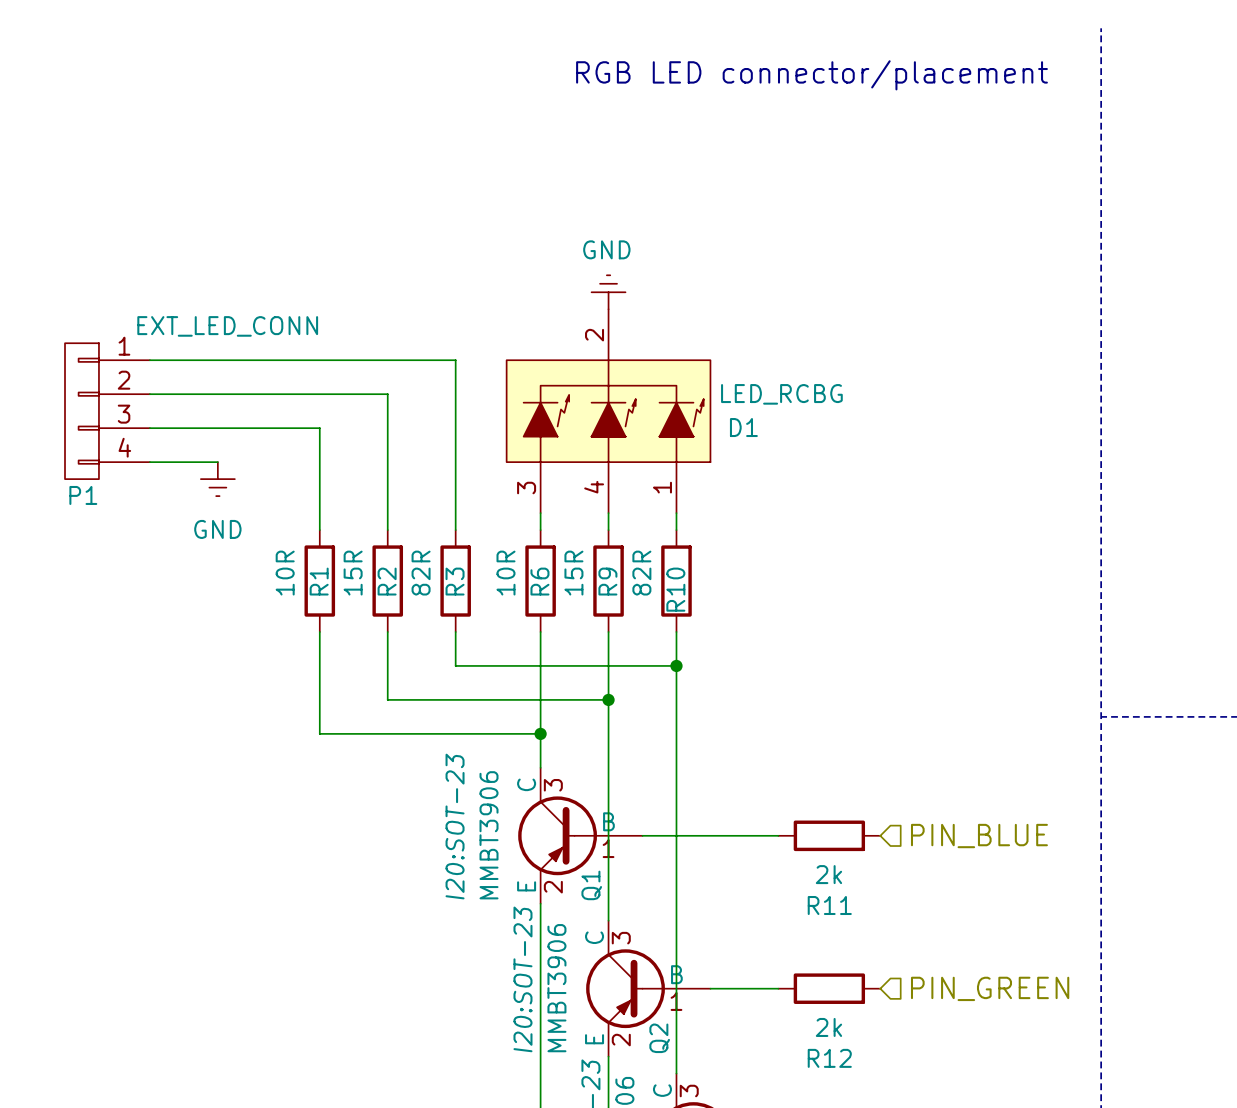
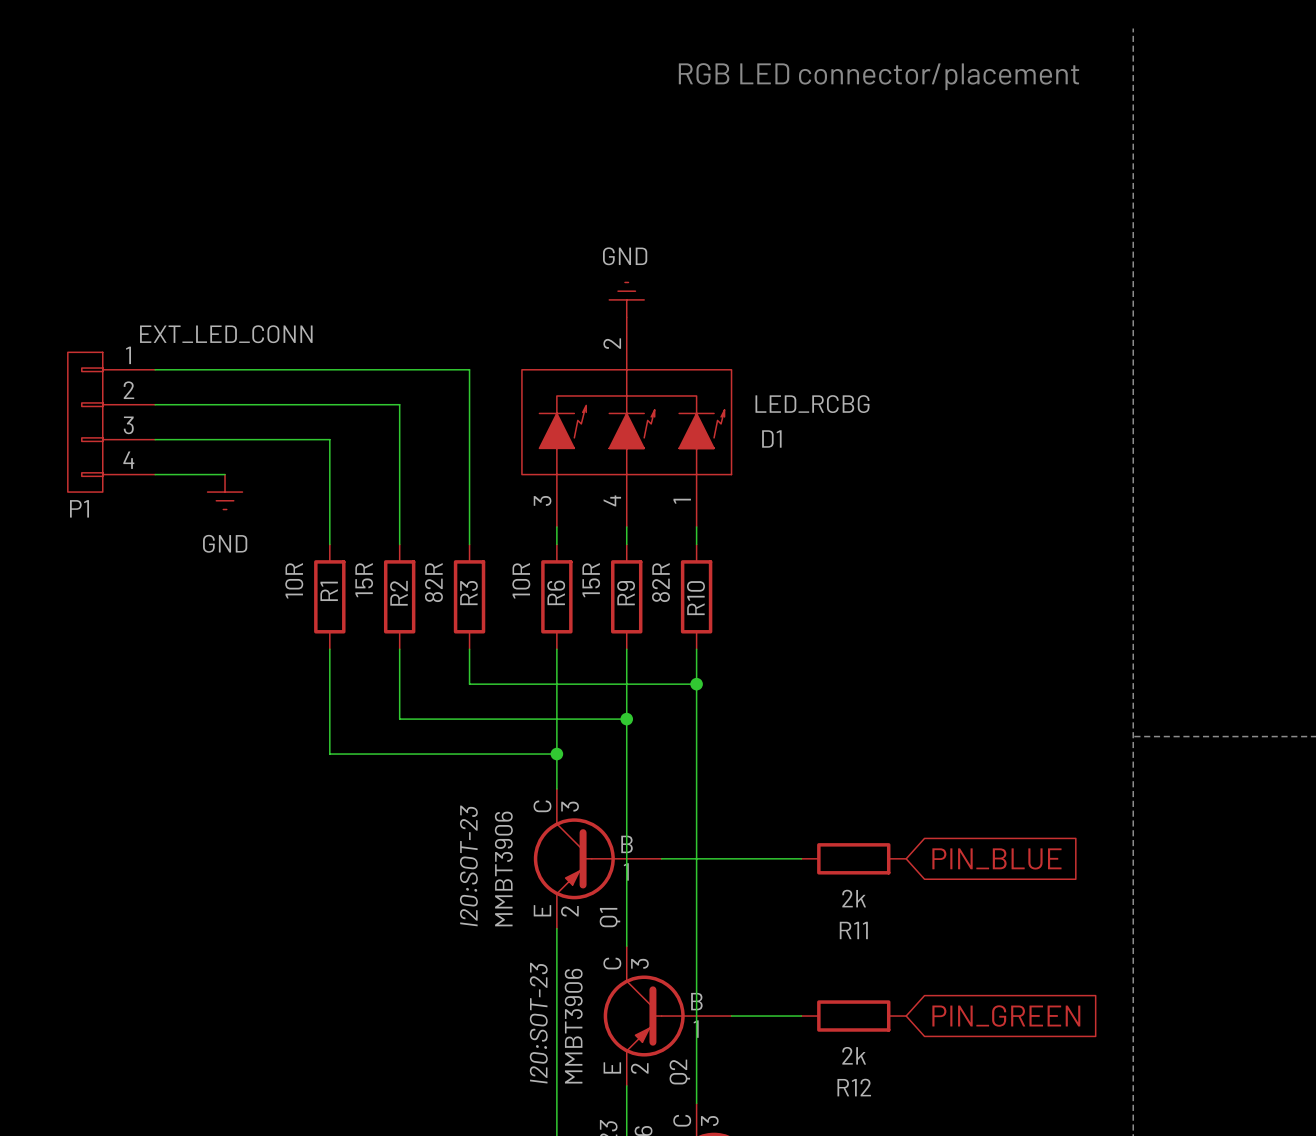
global label: none -> PIN_BLUE (996, 858)
hierarchical label: PIN_BLUE (979, 836) -> none
hierarchical label: PIN_GREEN (990, 988) -> none
global label: none -> PIN_GREEN (1006, 1016)

